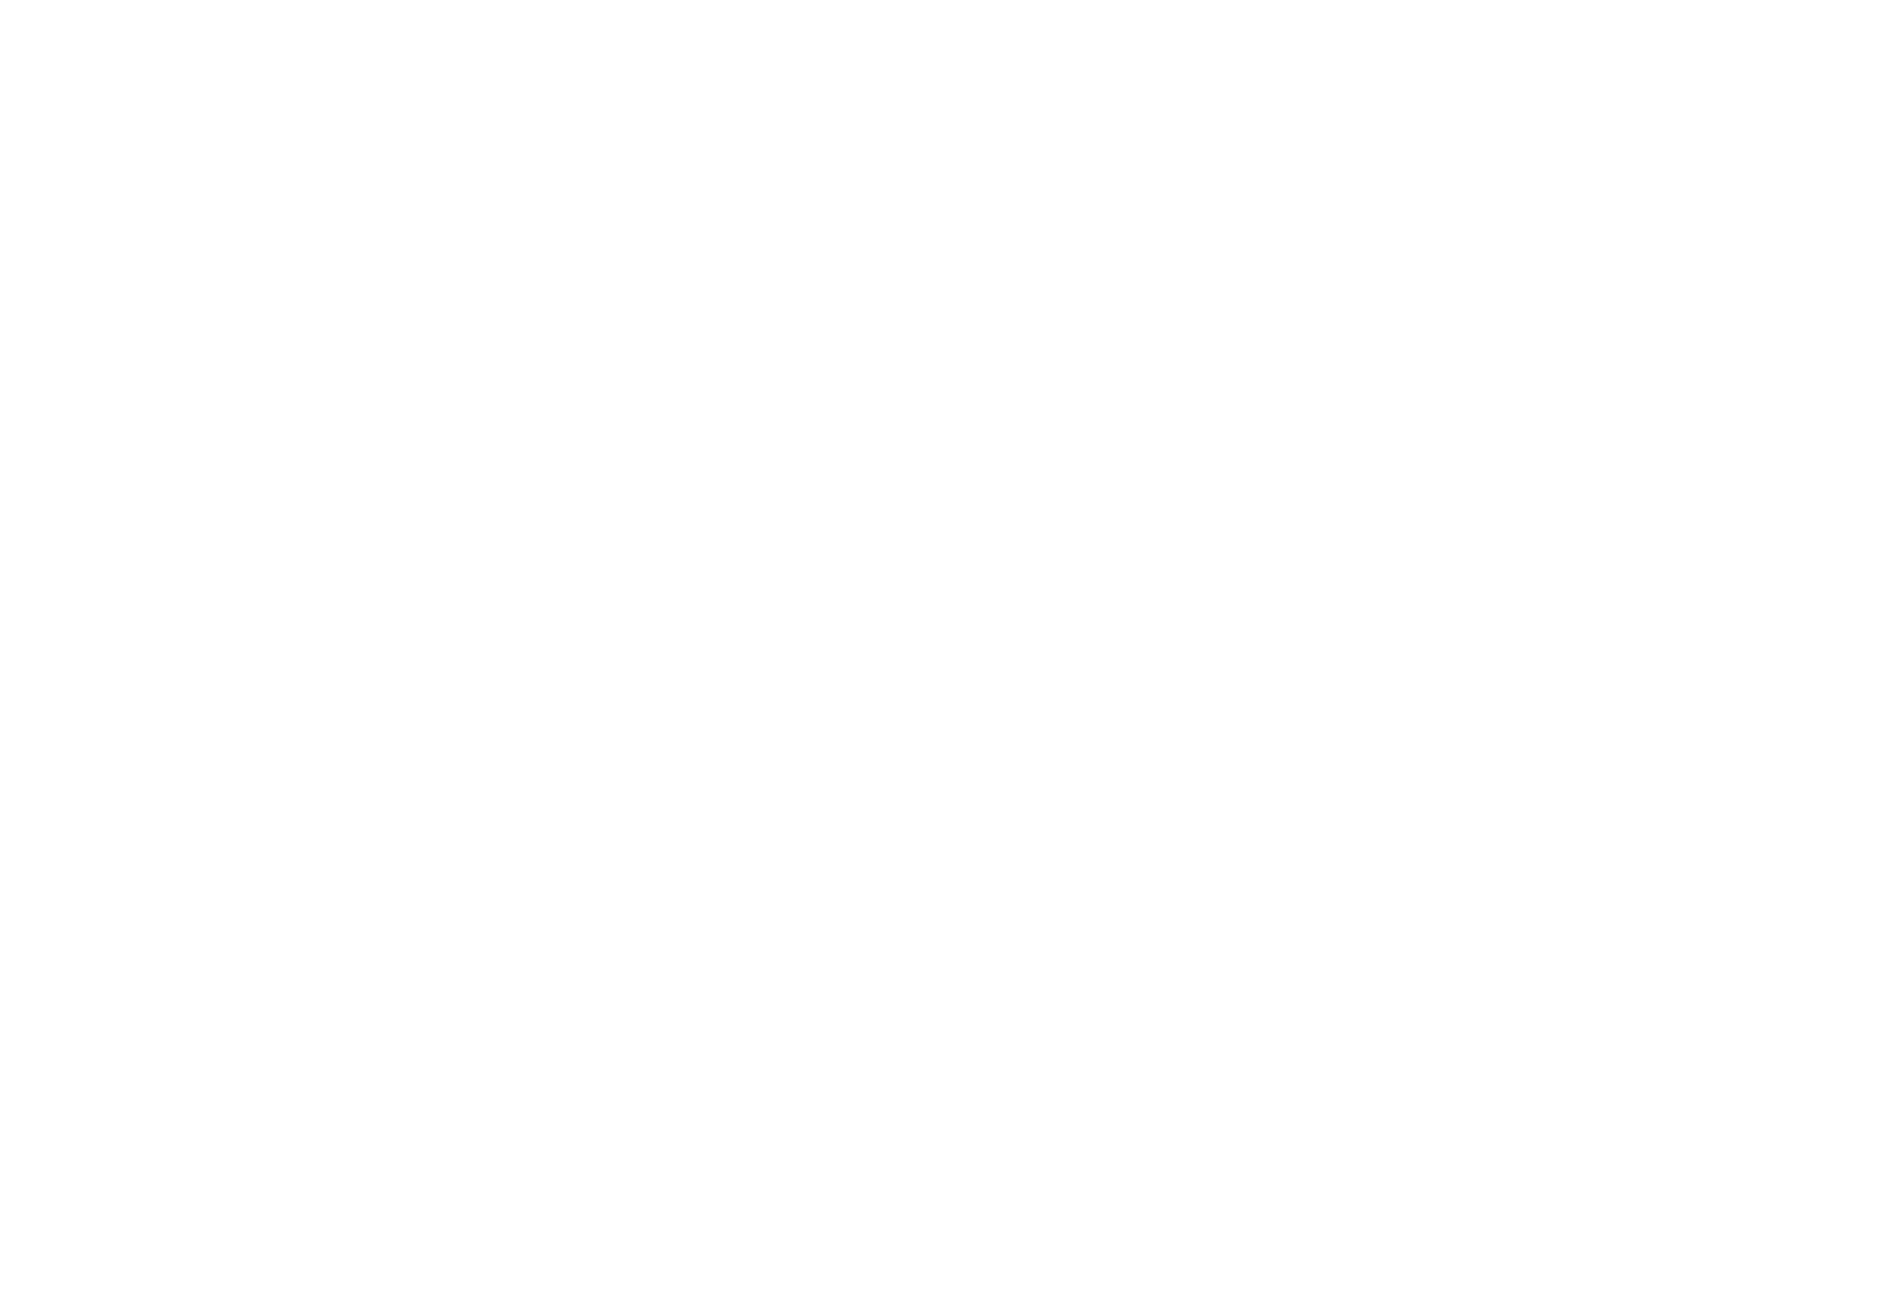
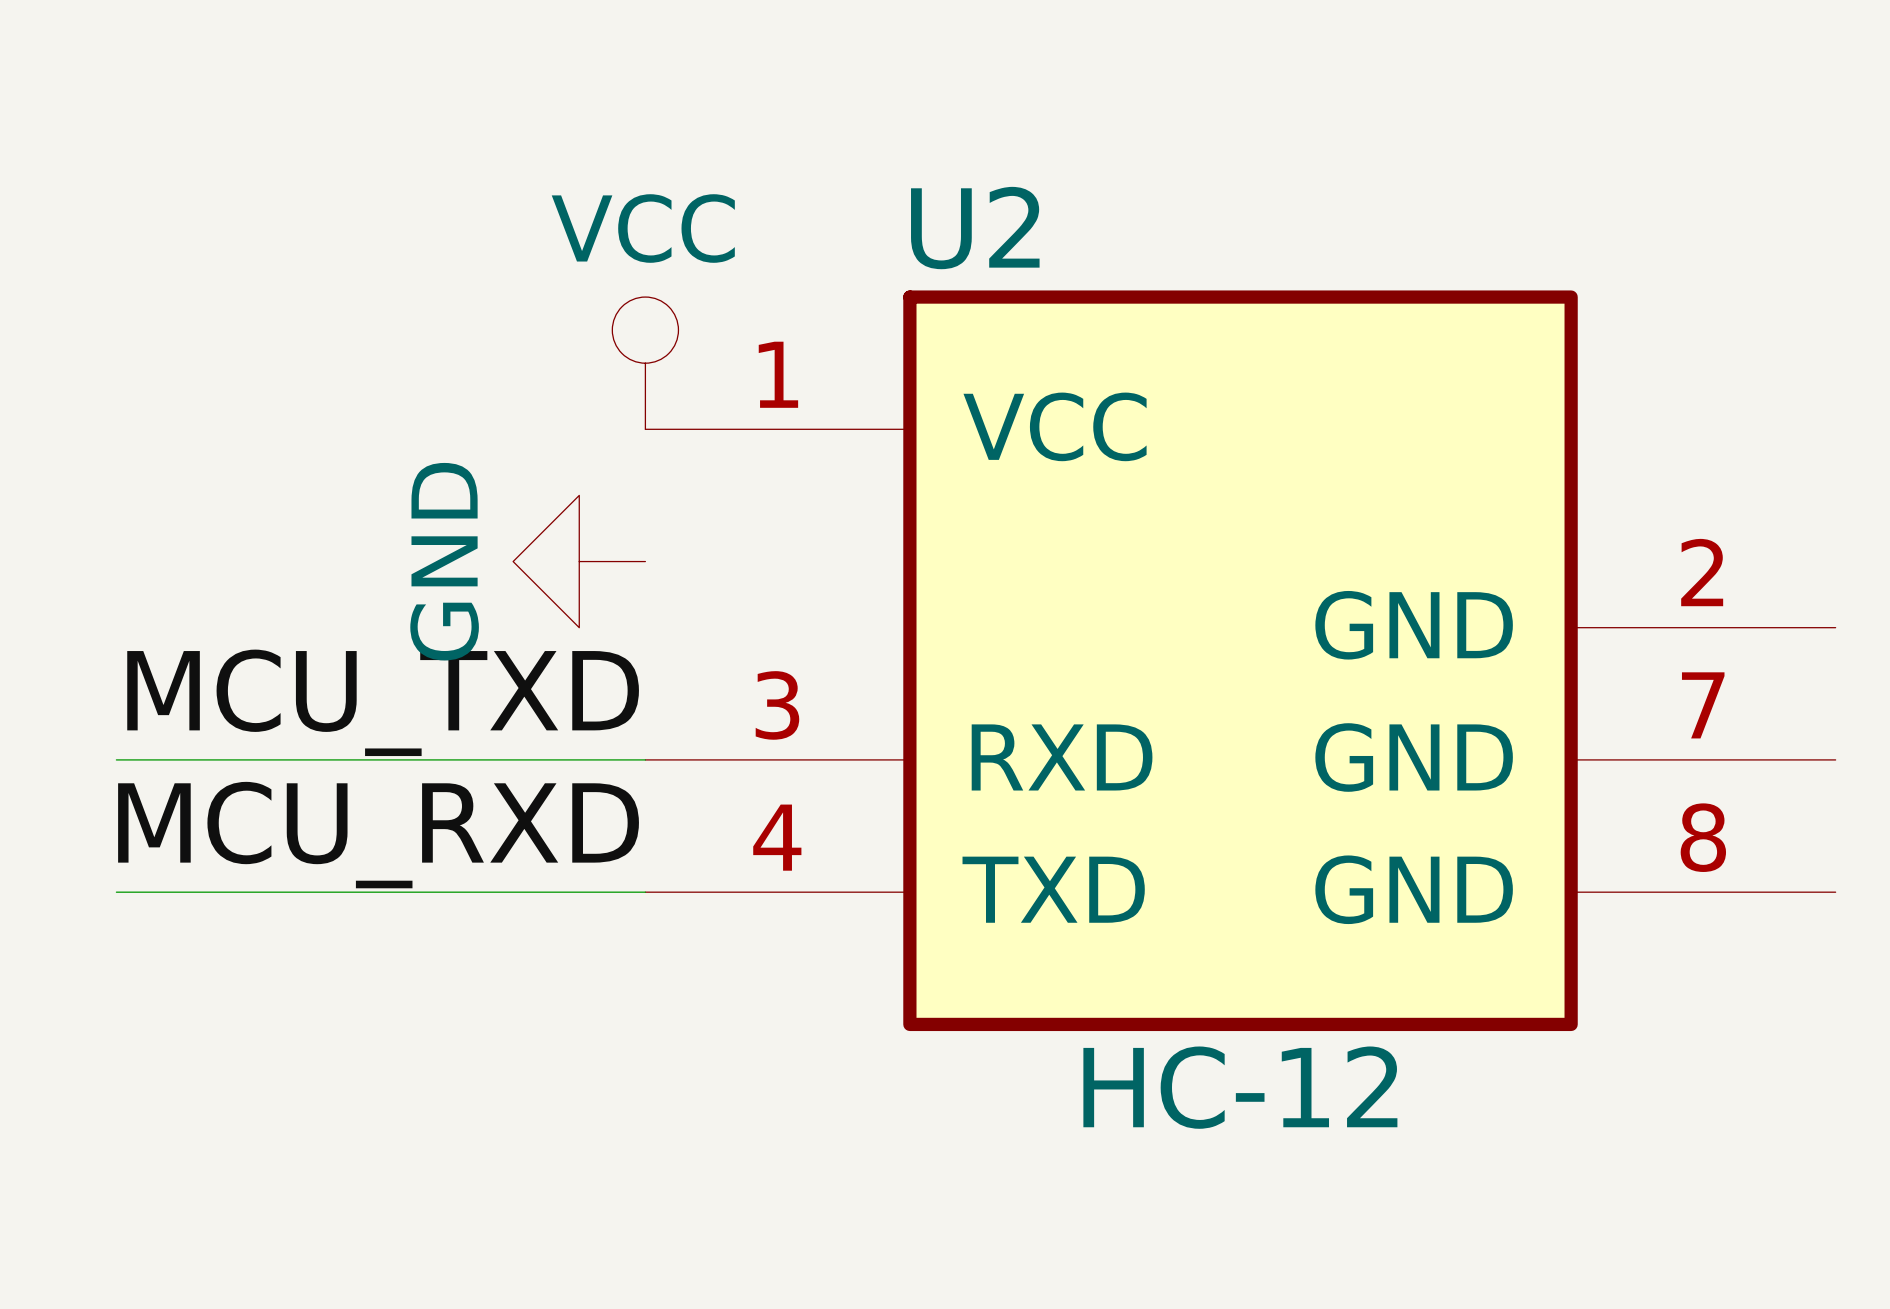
power symbol: none -> VCC (645, 363)
power symbol: none -> GND (579, 561)
U2: none -> HC-12 (1240, 660)
label: none -> MCU_TXD (383, 702)
wire: none -> (116, 759) (645, 759)
label: none -> MCU_RXD (378, 835)
wire: none -> (116, 892) (645, 892)

